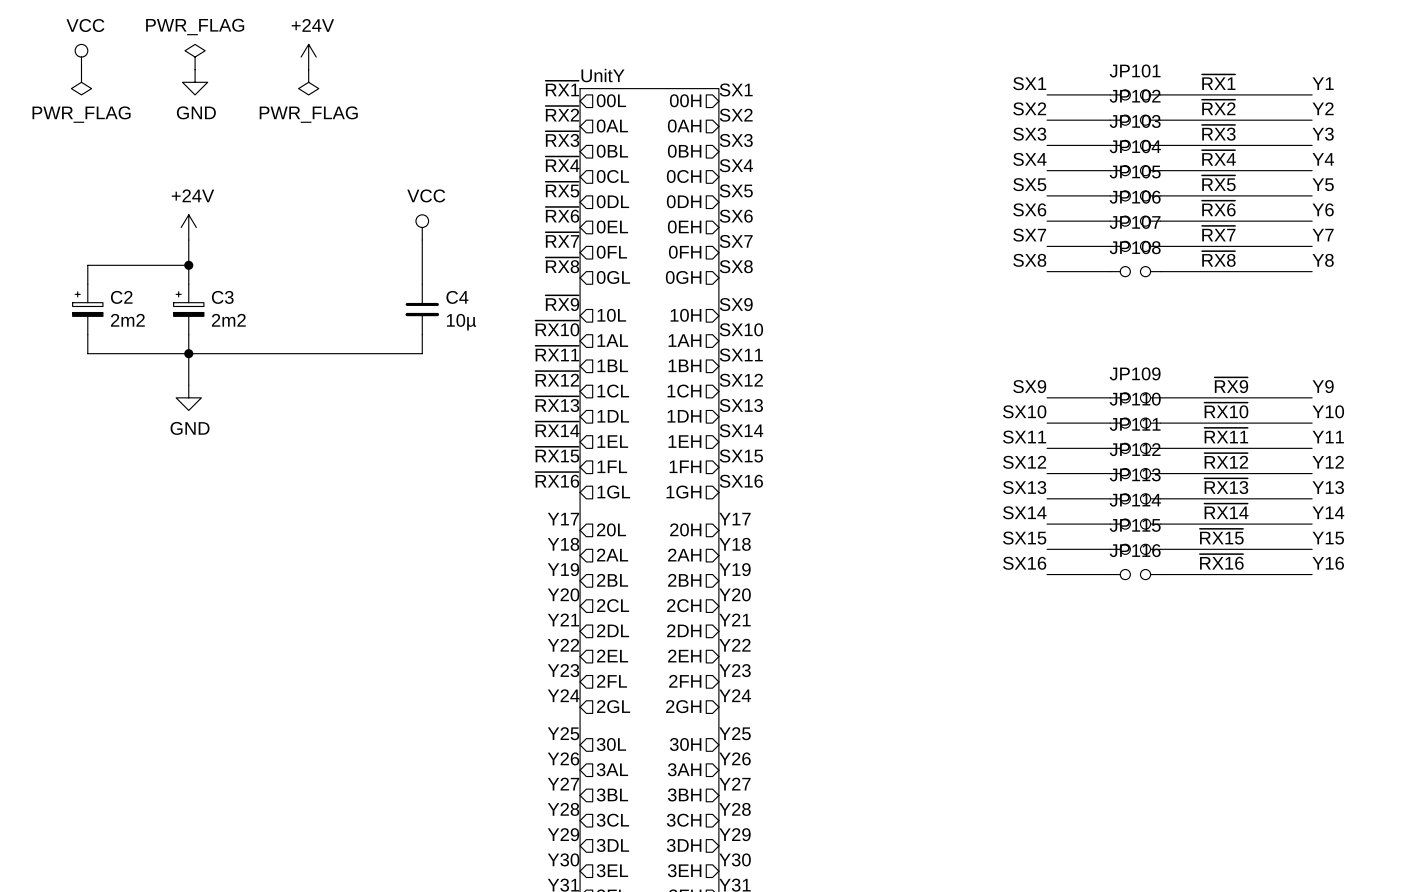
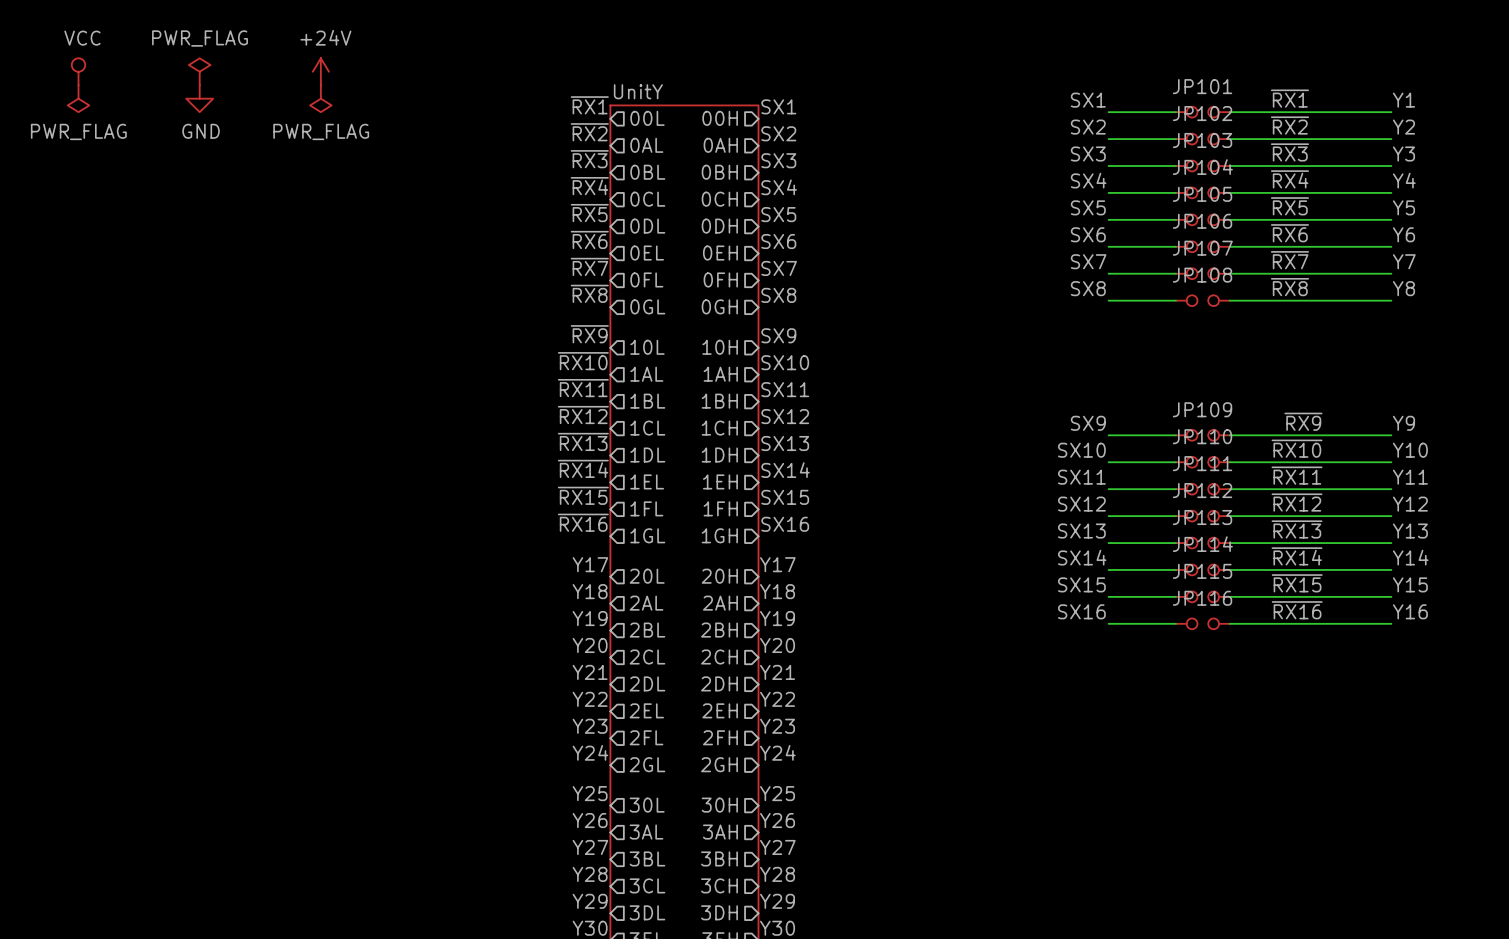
power symbol: +24V (188, 227) -> none
power symbol: VCC (422, 227) -> none
wire: (188, 240) (188, 284) -> none
wire: (422, 240) (422, 284) -> none
wire: (188, 265) (87, 265) (87, 284) -> none
junction: (188, 265) -> none
C2: 2m2 (87, 309) -> none
C3: 2m2 (188, 309) -> none
C4: 10µ (422, 309) -> none
wire: (87, 334) (87, 353) (422, 353) (422, 334) -> none
wire: (188, 334) (188, 385) -> none
junction: (188, 353) -> none
power symbol: GND (188, 397) -> none

